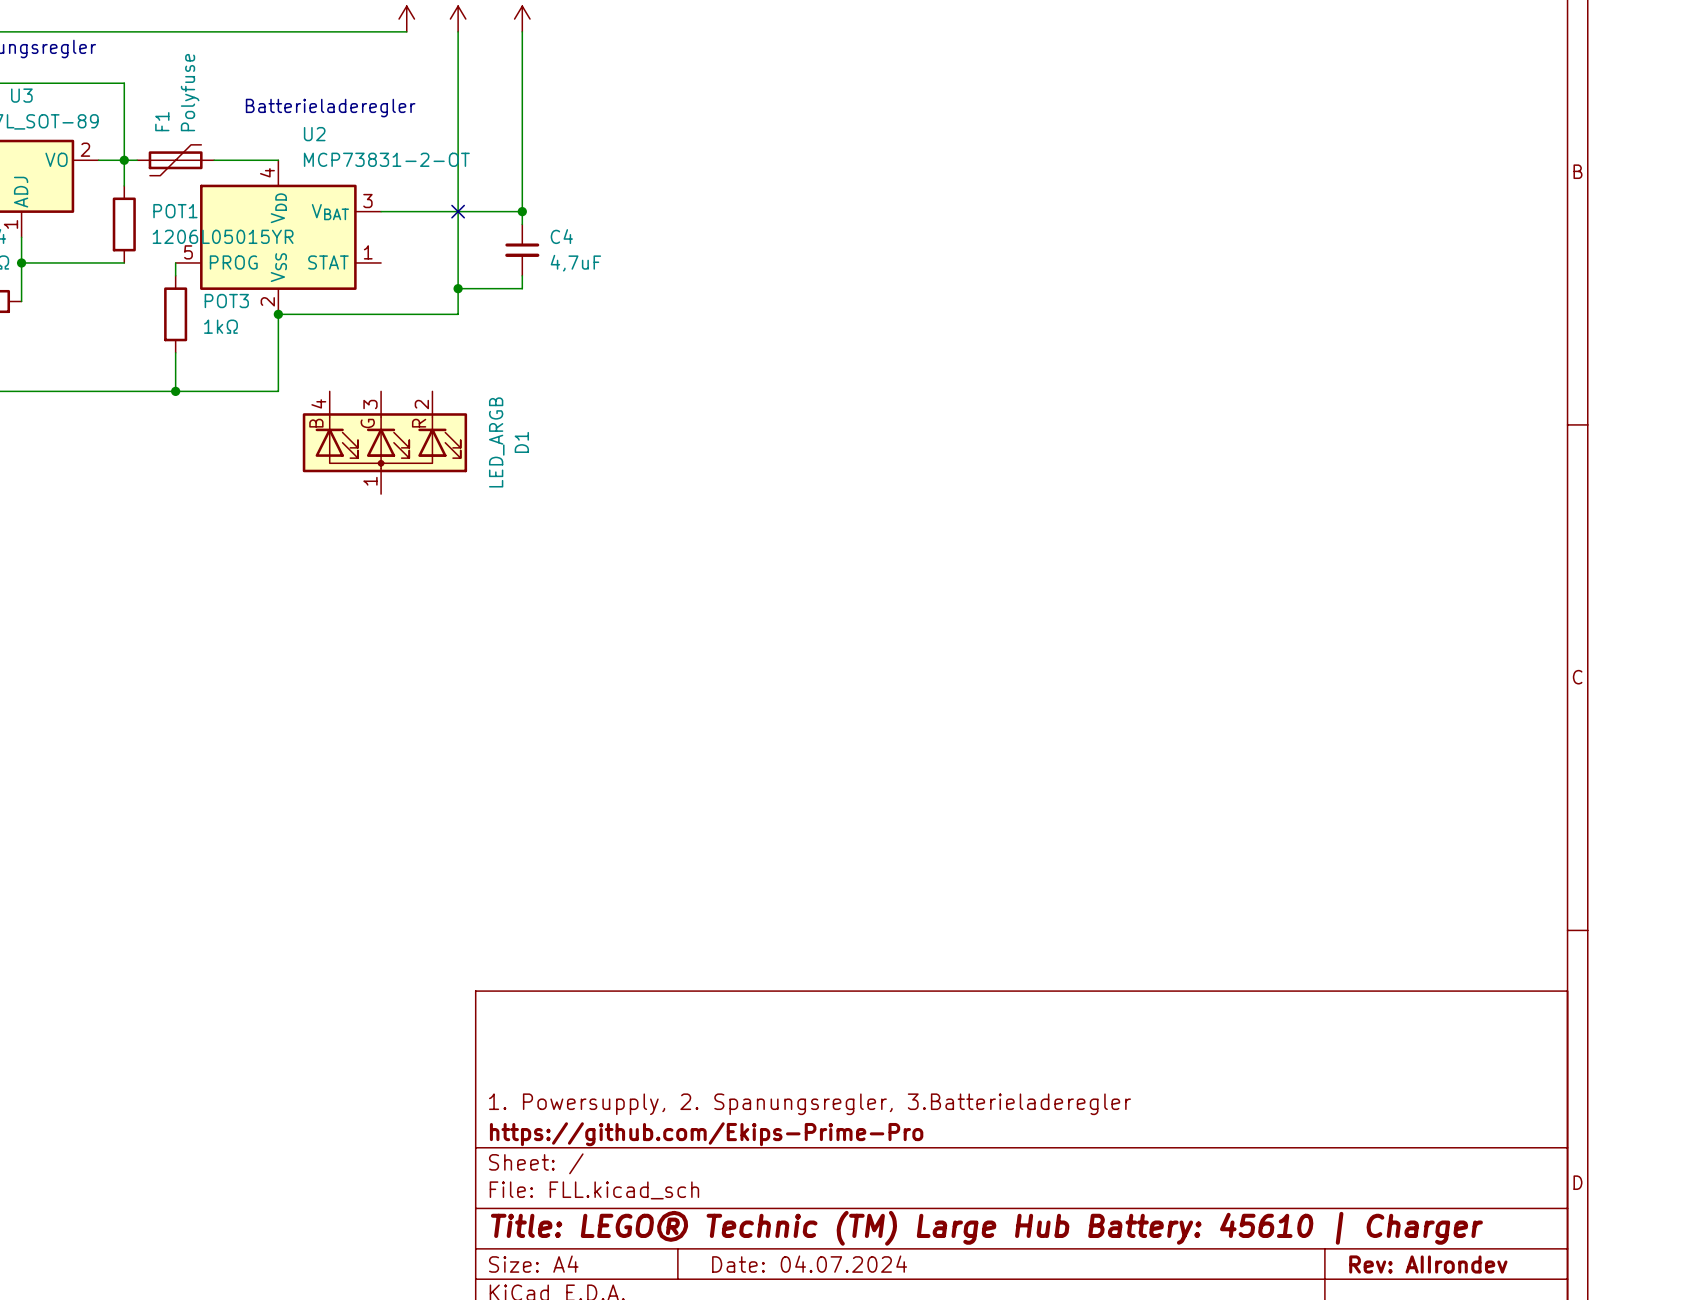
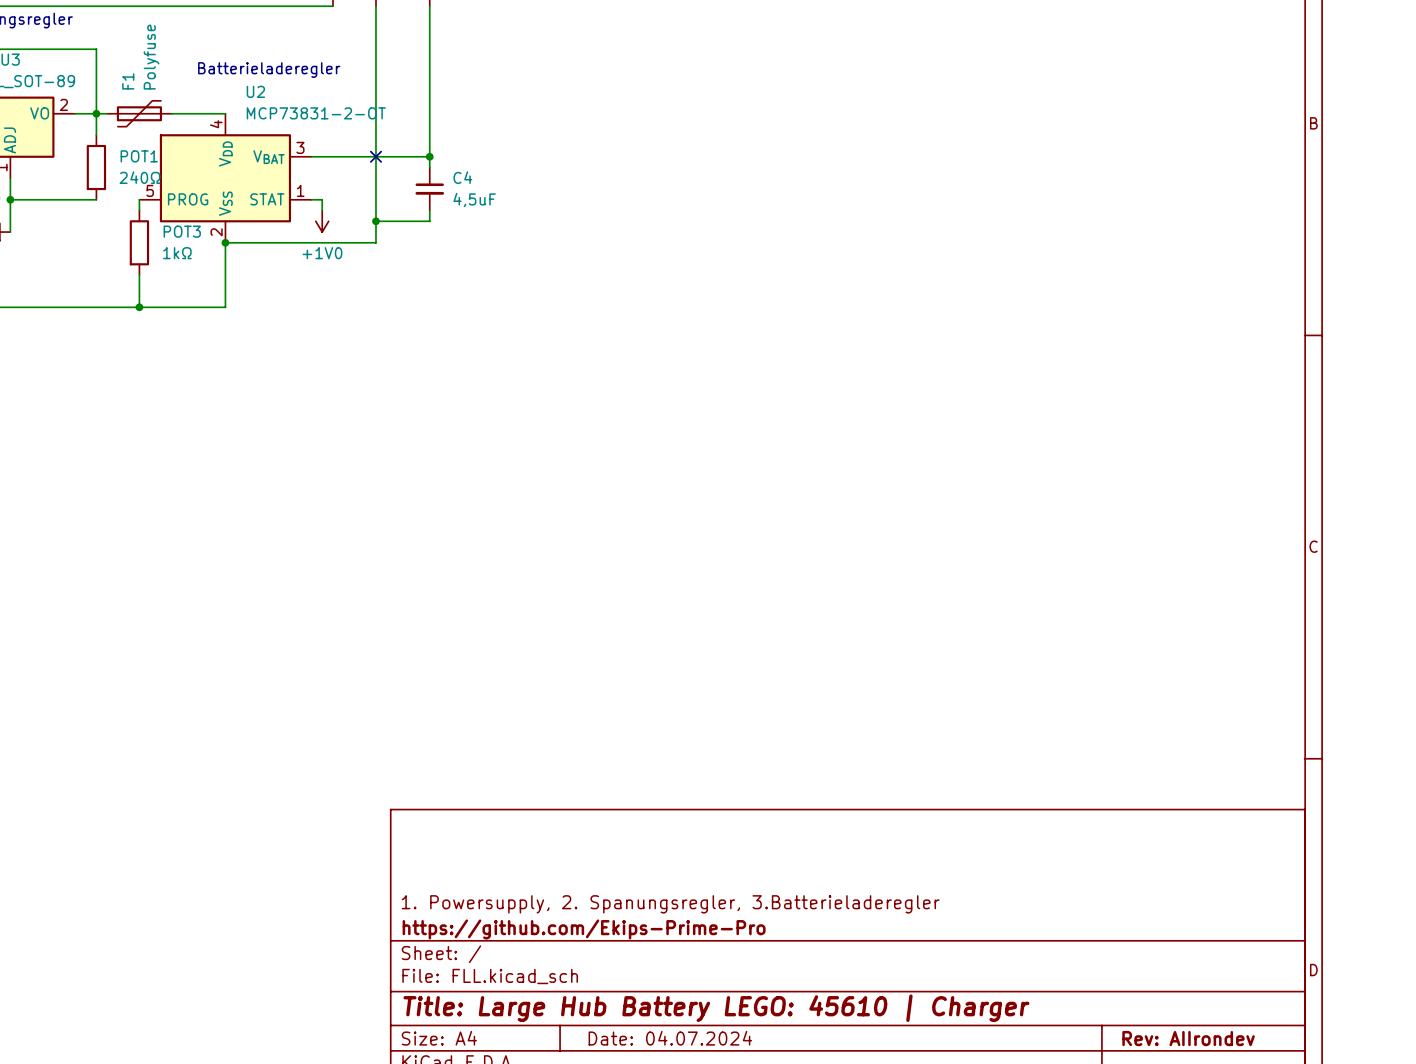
POT1 value: 1206L05015YR (223, 236) -> 240Ω (140, 177)
wire: none -> (311, 199) (322, 199) (322, 210)
C4 value: 4,7uF (575, 263) -> 4,5uF (474, 199)
power symbol: none -> +1V0 (322, 221)
D1: LED_ARGB (384, 442) -> none
title block: Title: LEGO® Technic (TM) Large Hub Battery: 45610 | Charger (986, 1228) -> Title: Large Hub Battery LEGO: 45610 | Charger (716, 1008)

